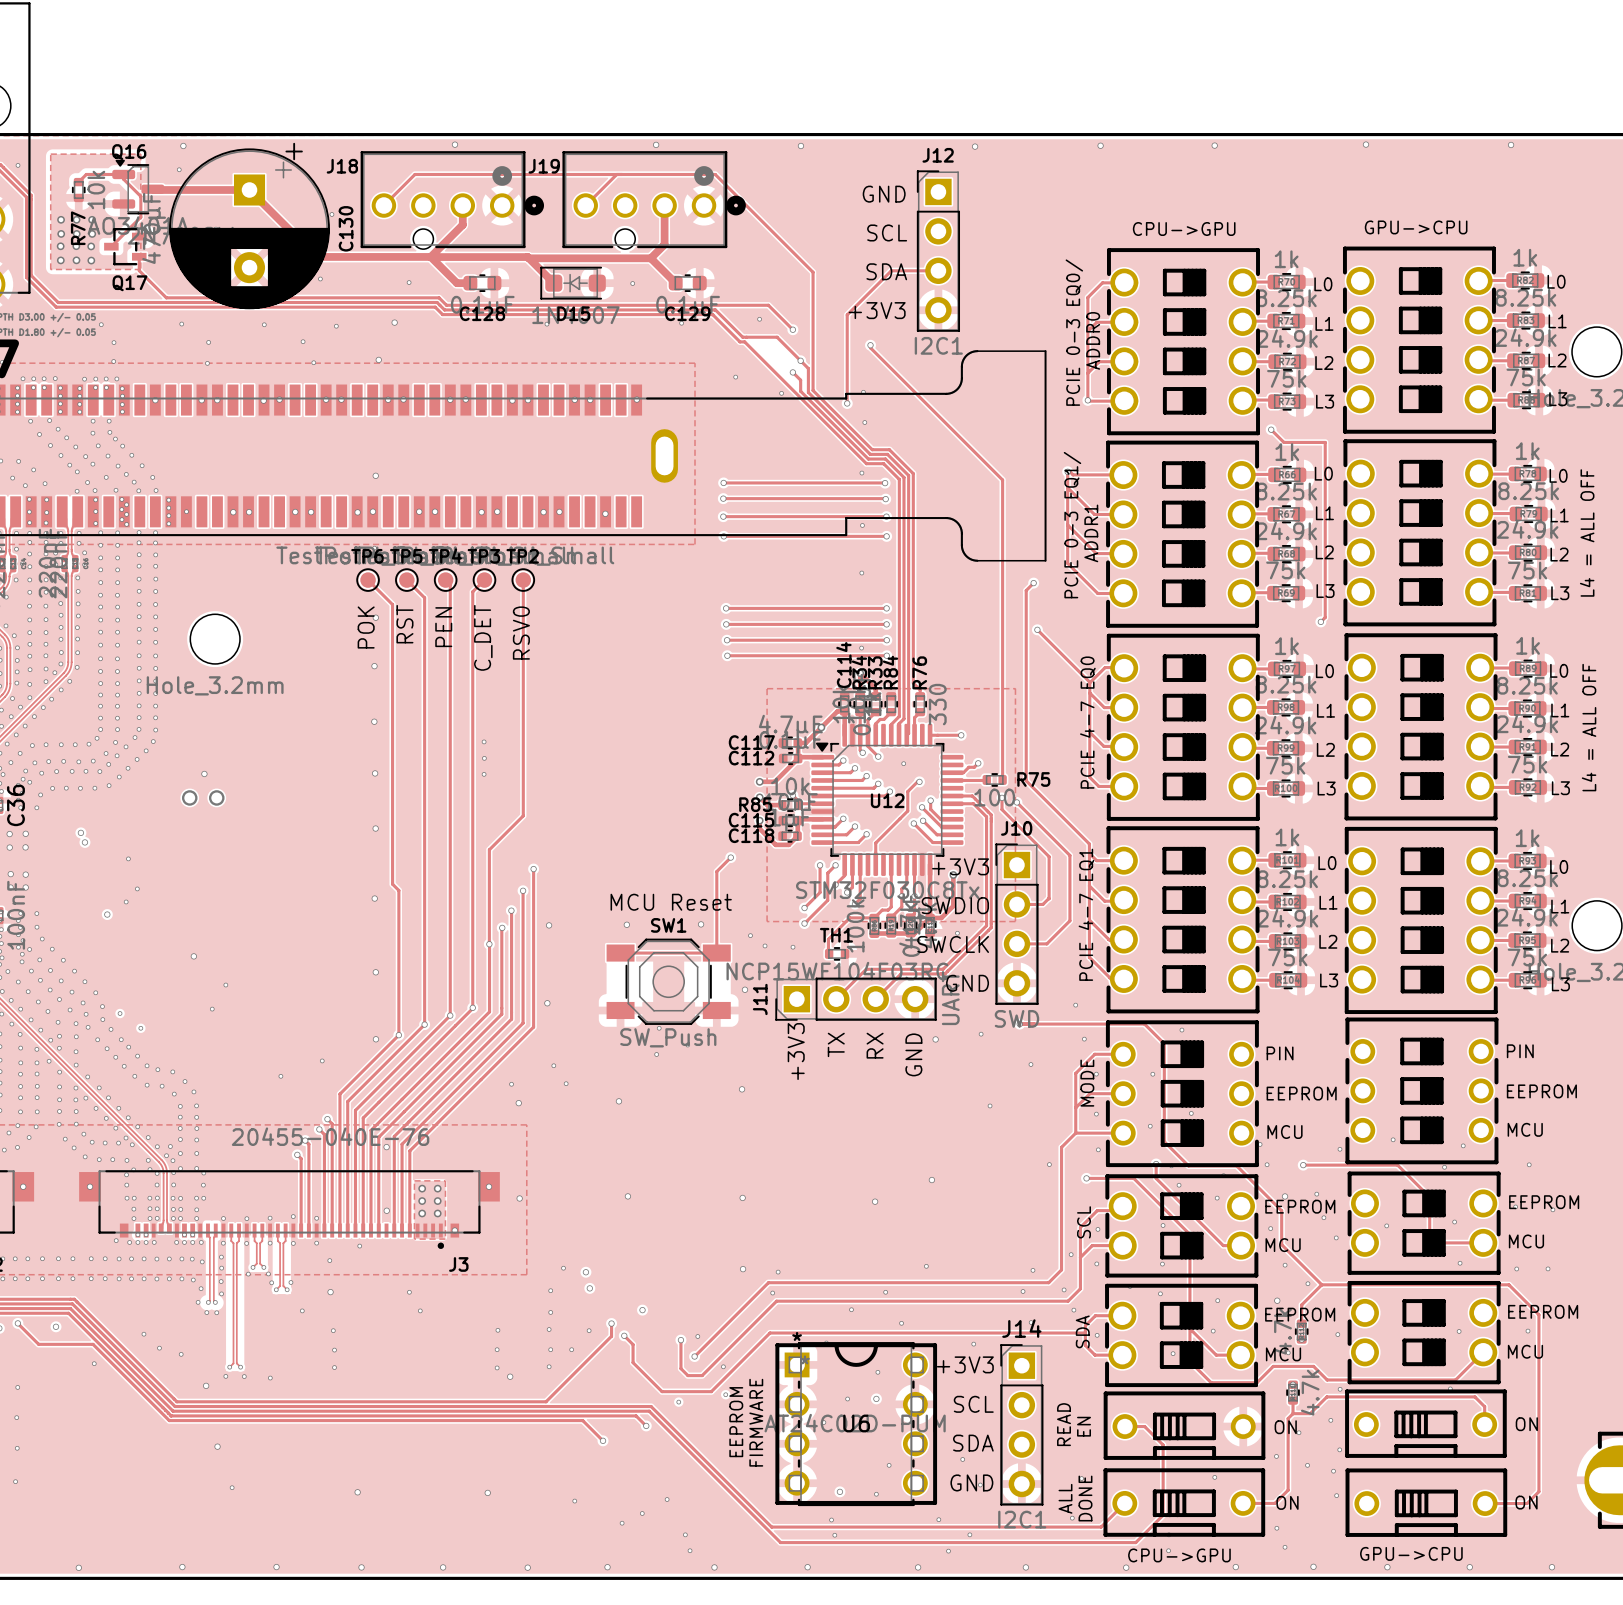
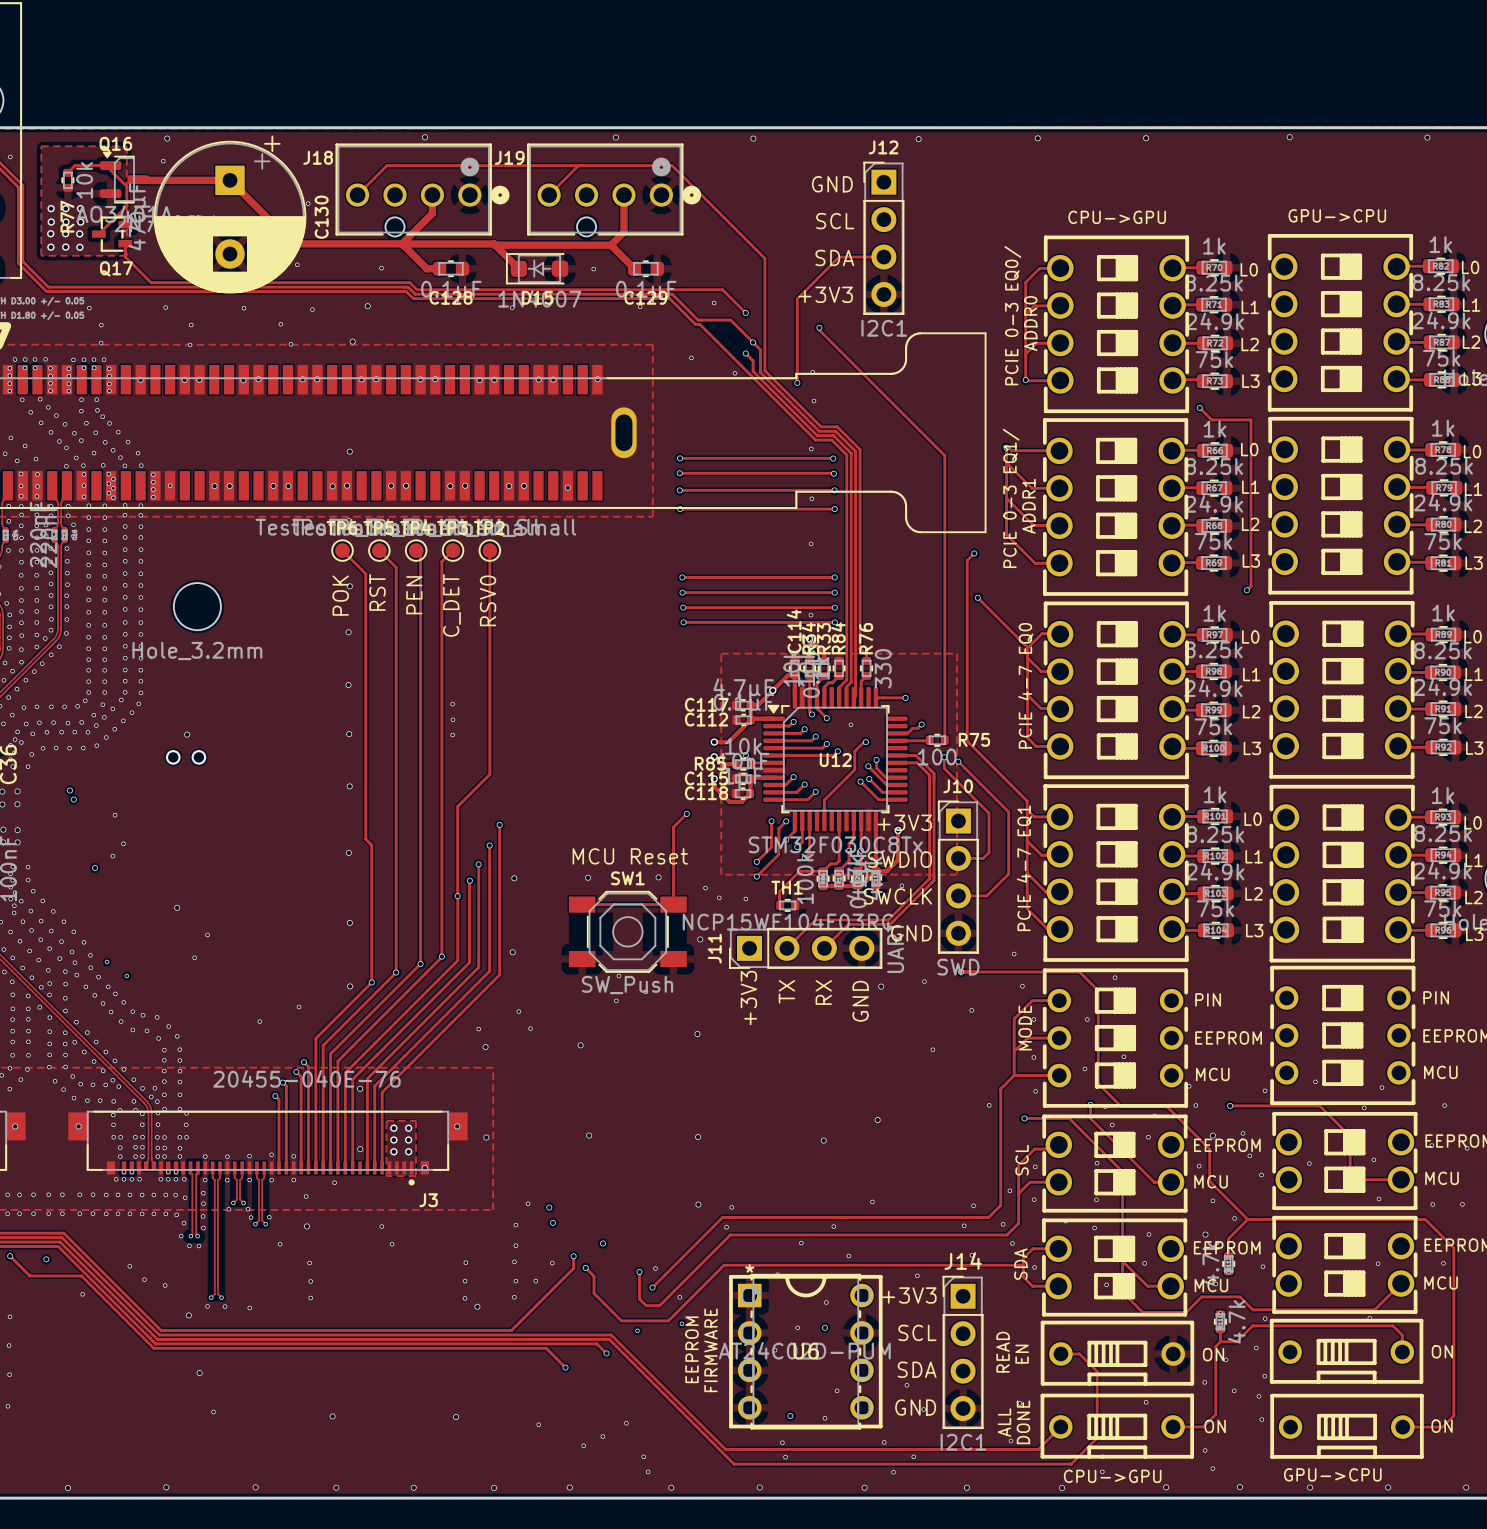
via: (116, 1240) -> none

